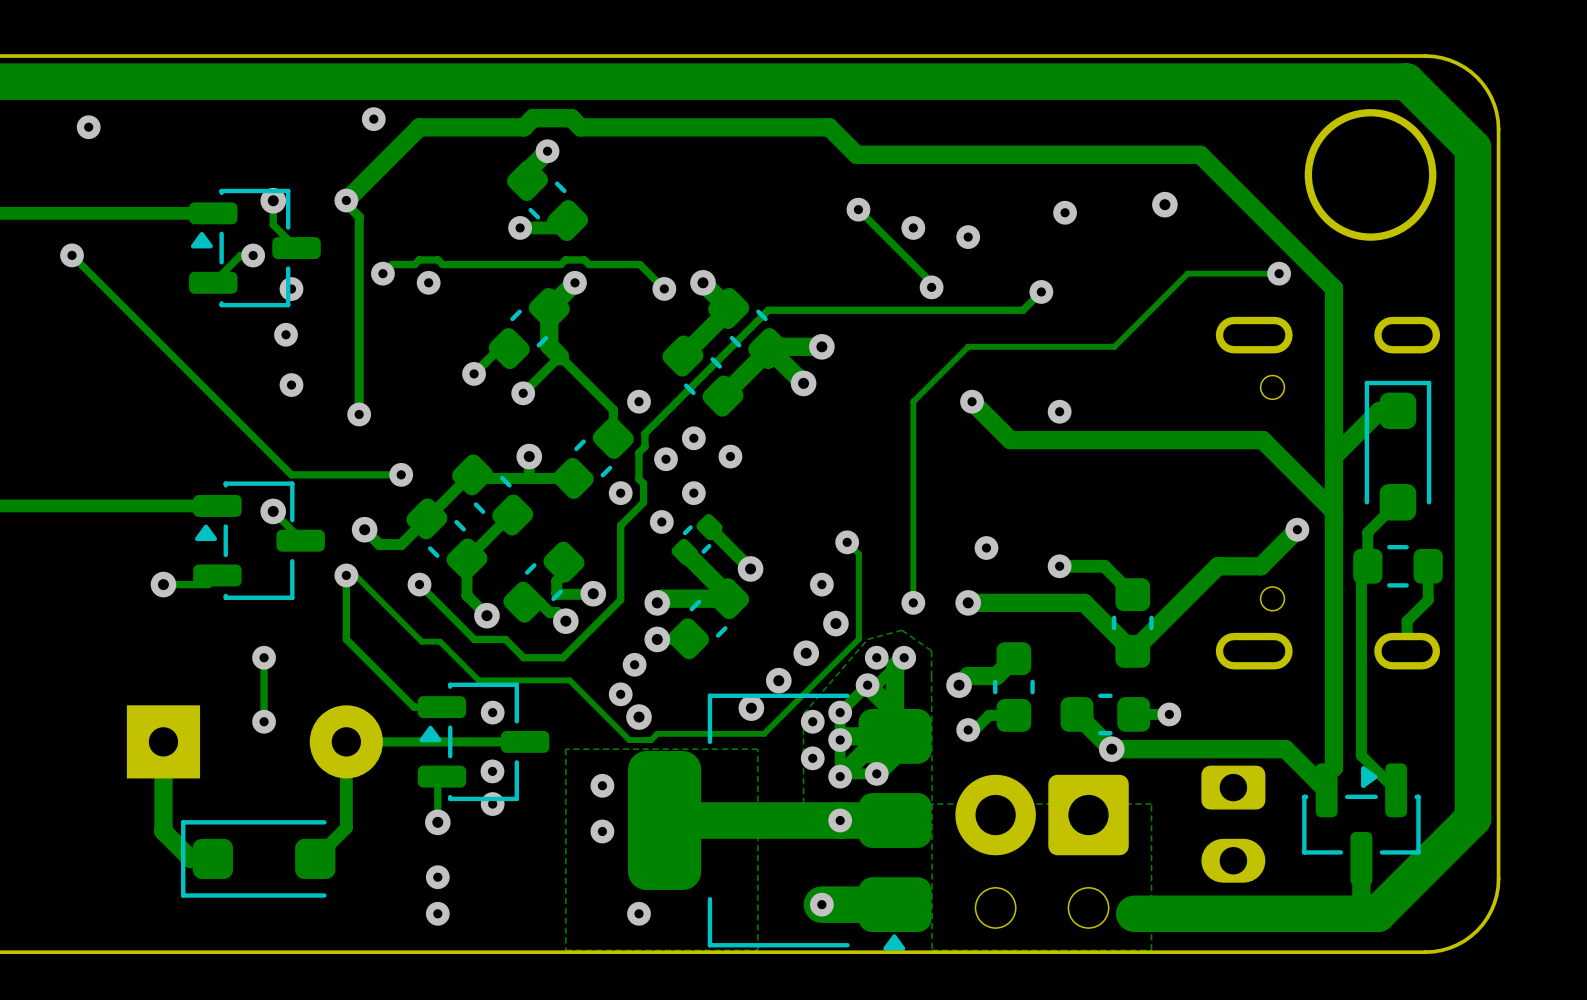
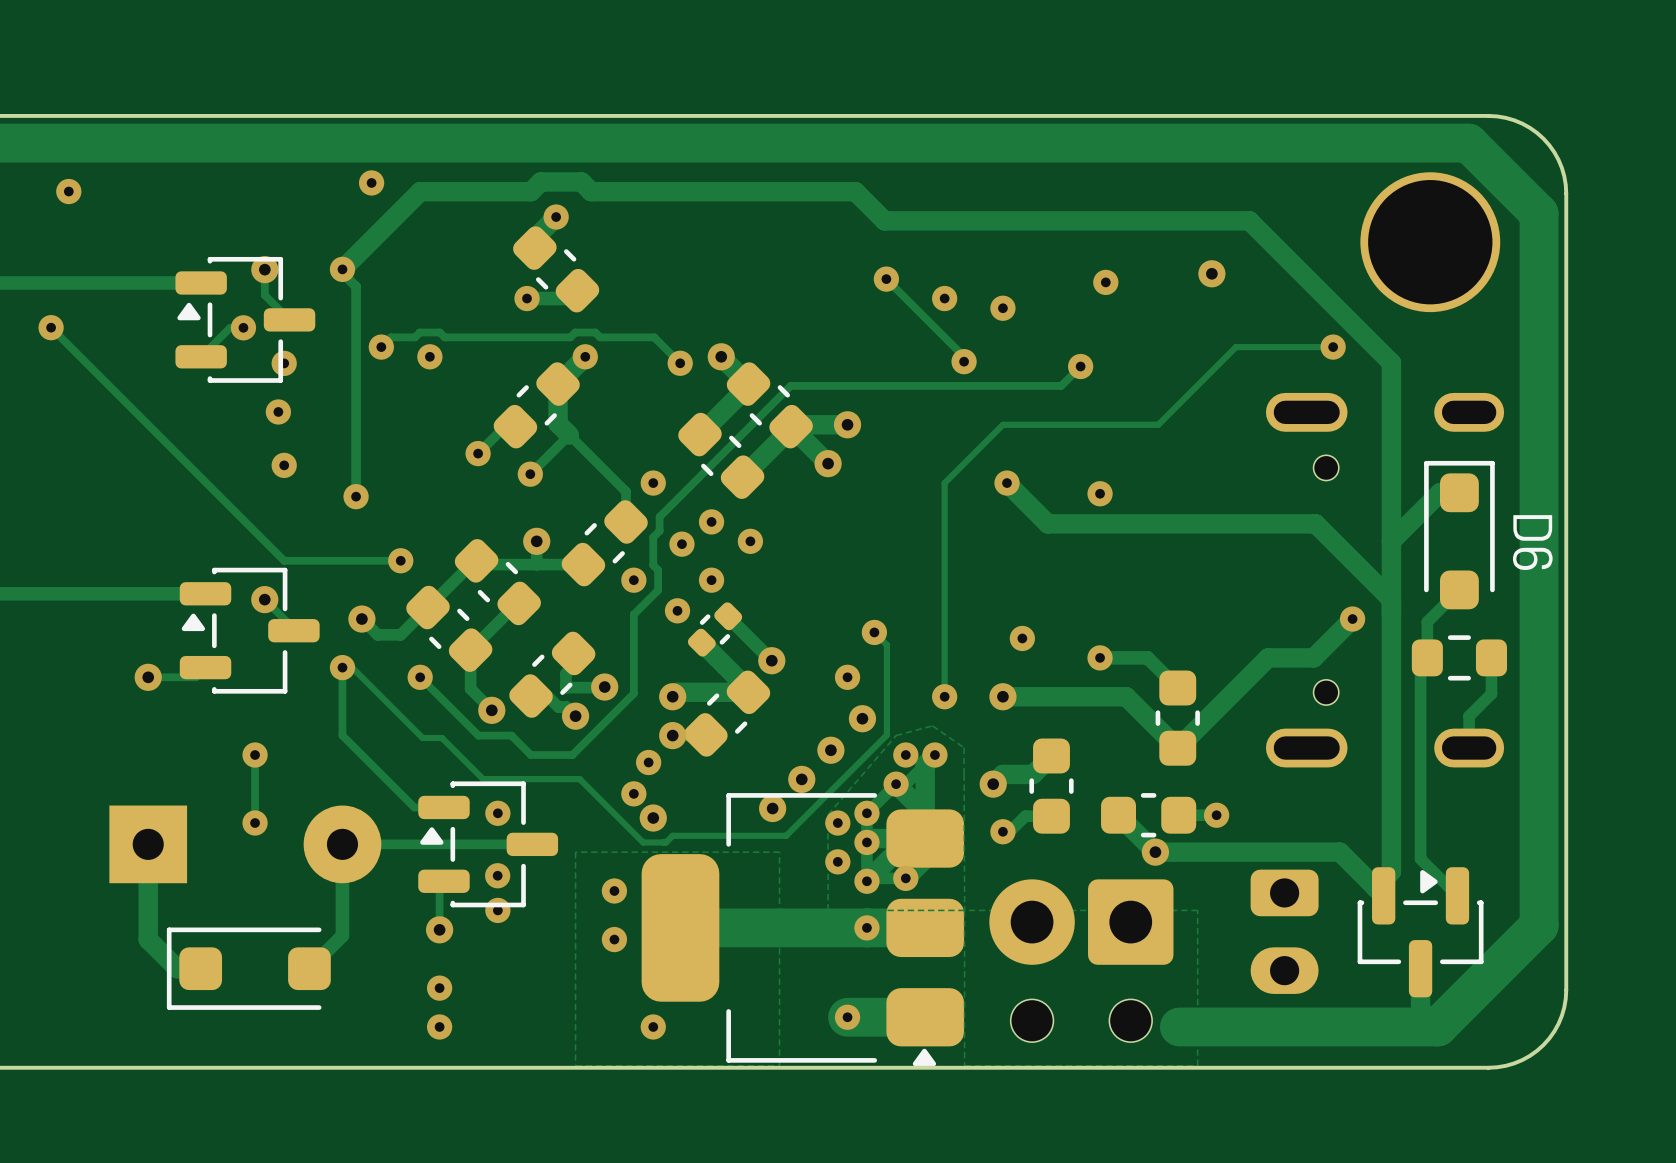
D6 name: none -> D6 (1532, 542)

